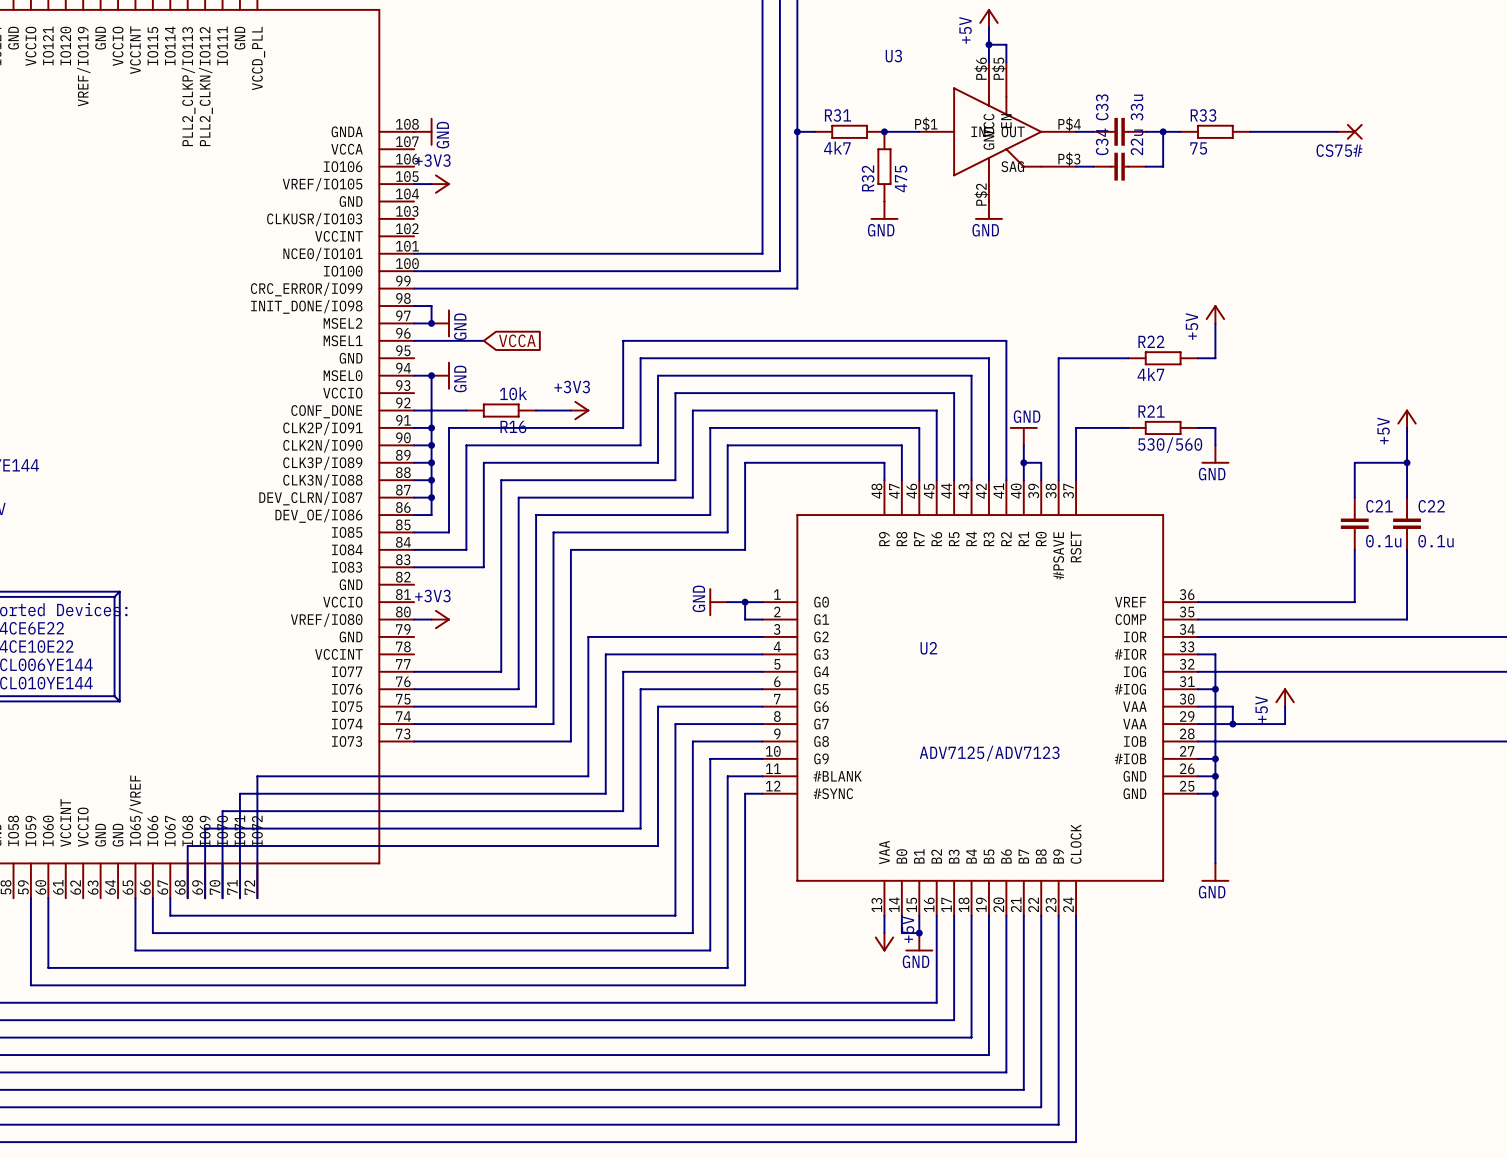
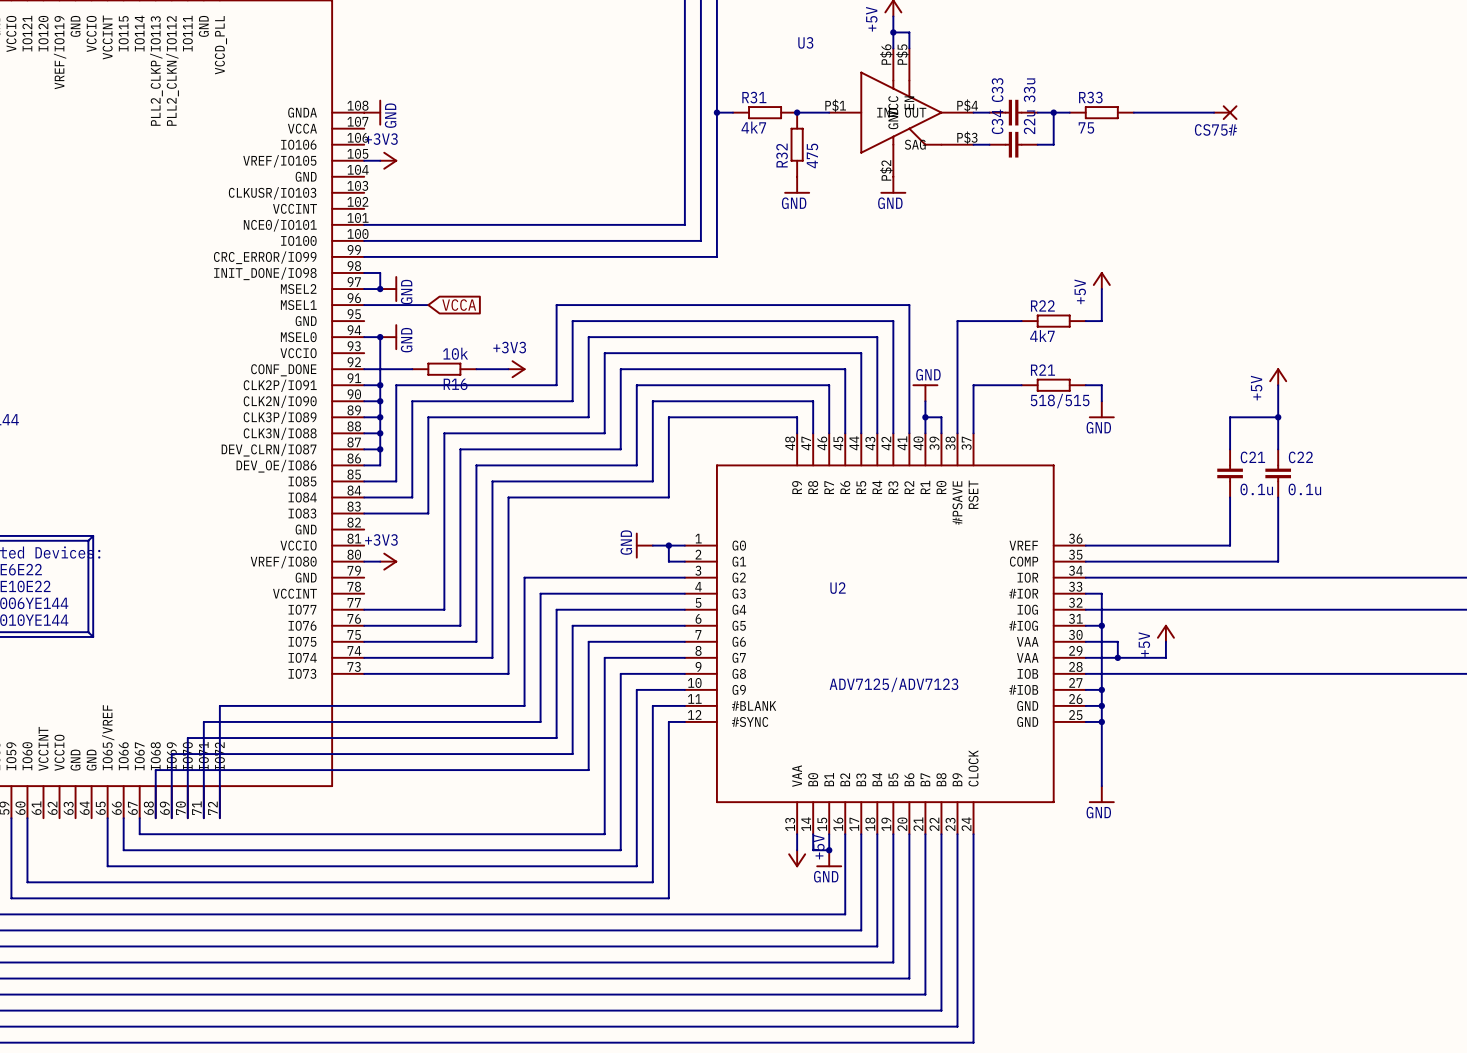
R21 value: 530/560 (1170, 445) -> 518/515 (1060, 401)

